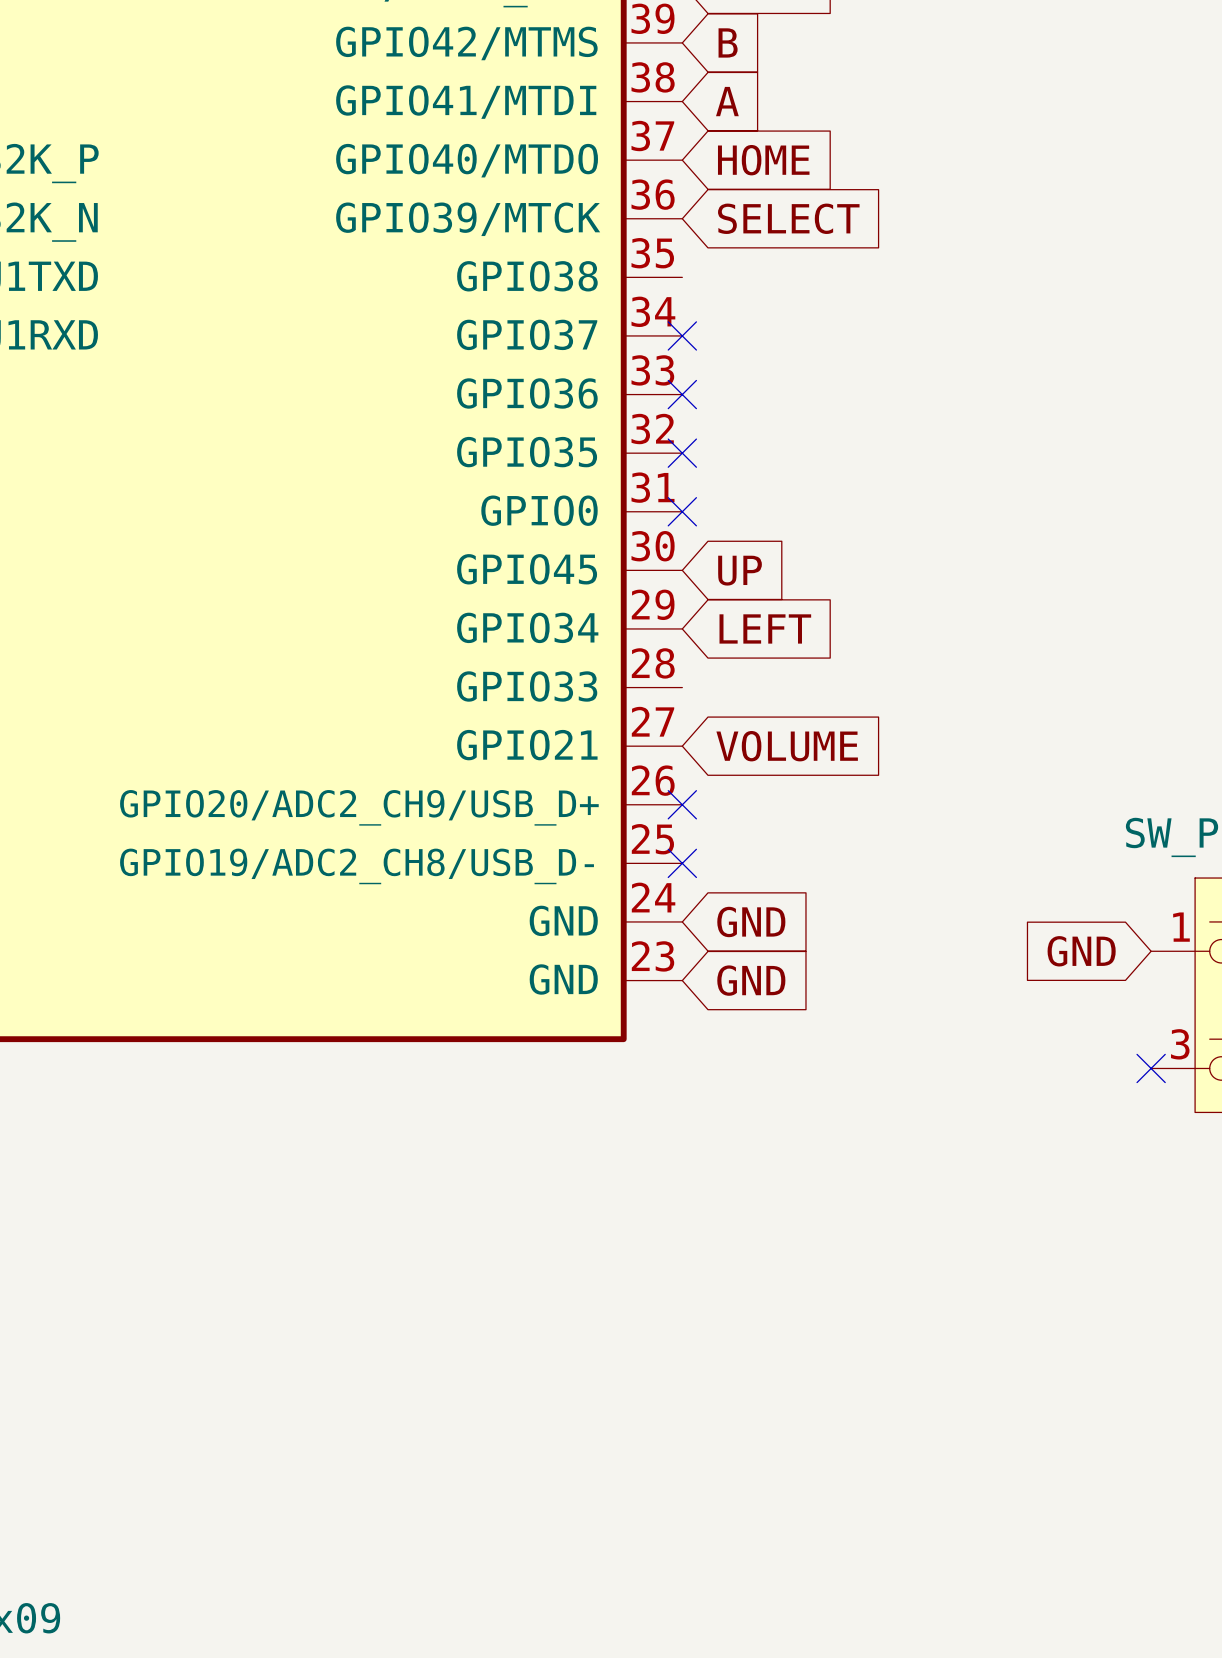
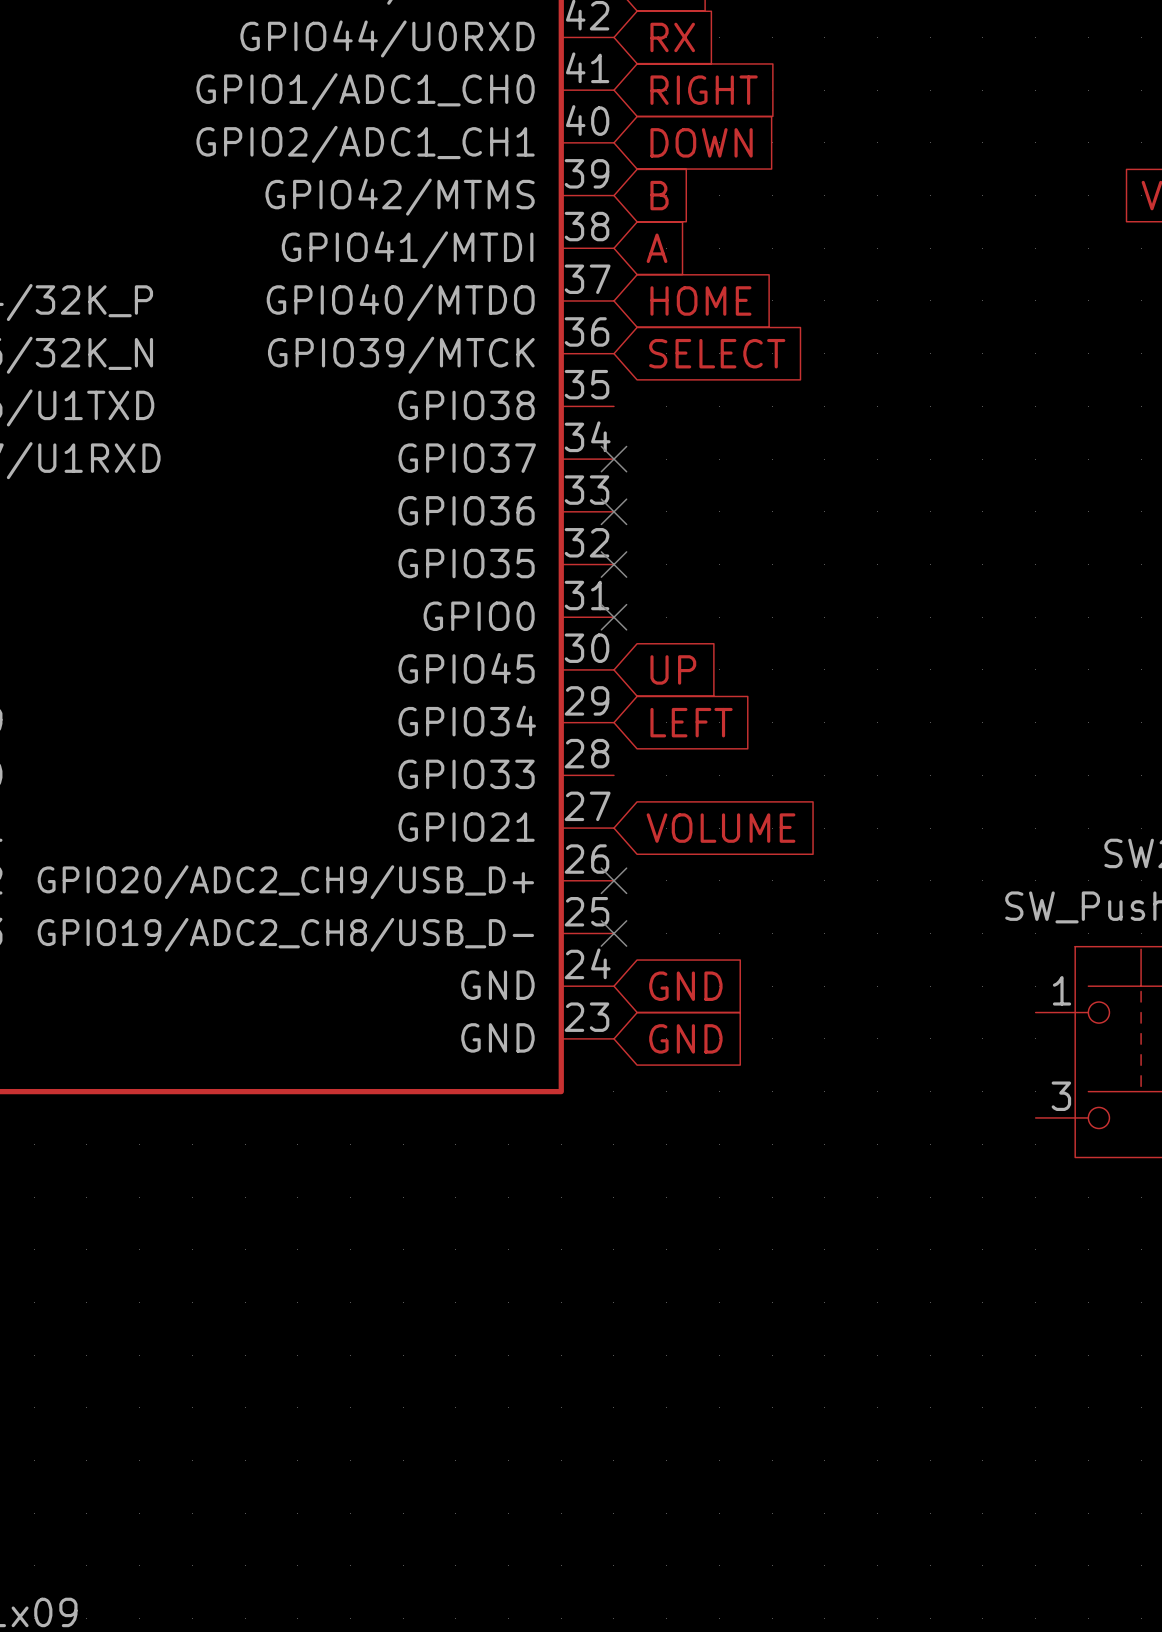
global label: GND (1081, 951) -> none
no-connect mark: (1151, 1068) -> none

